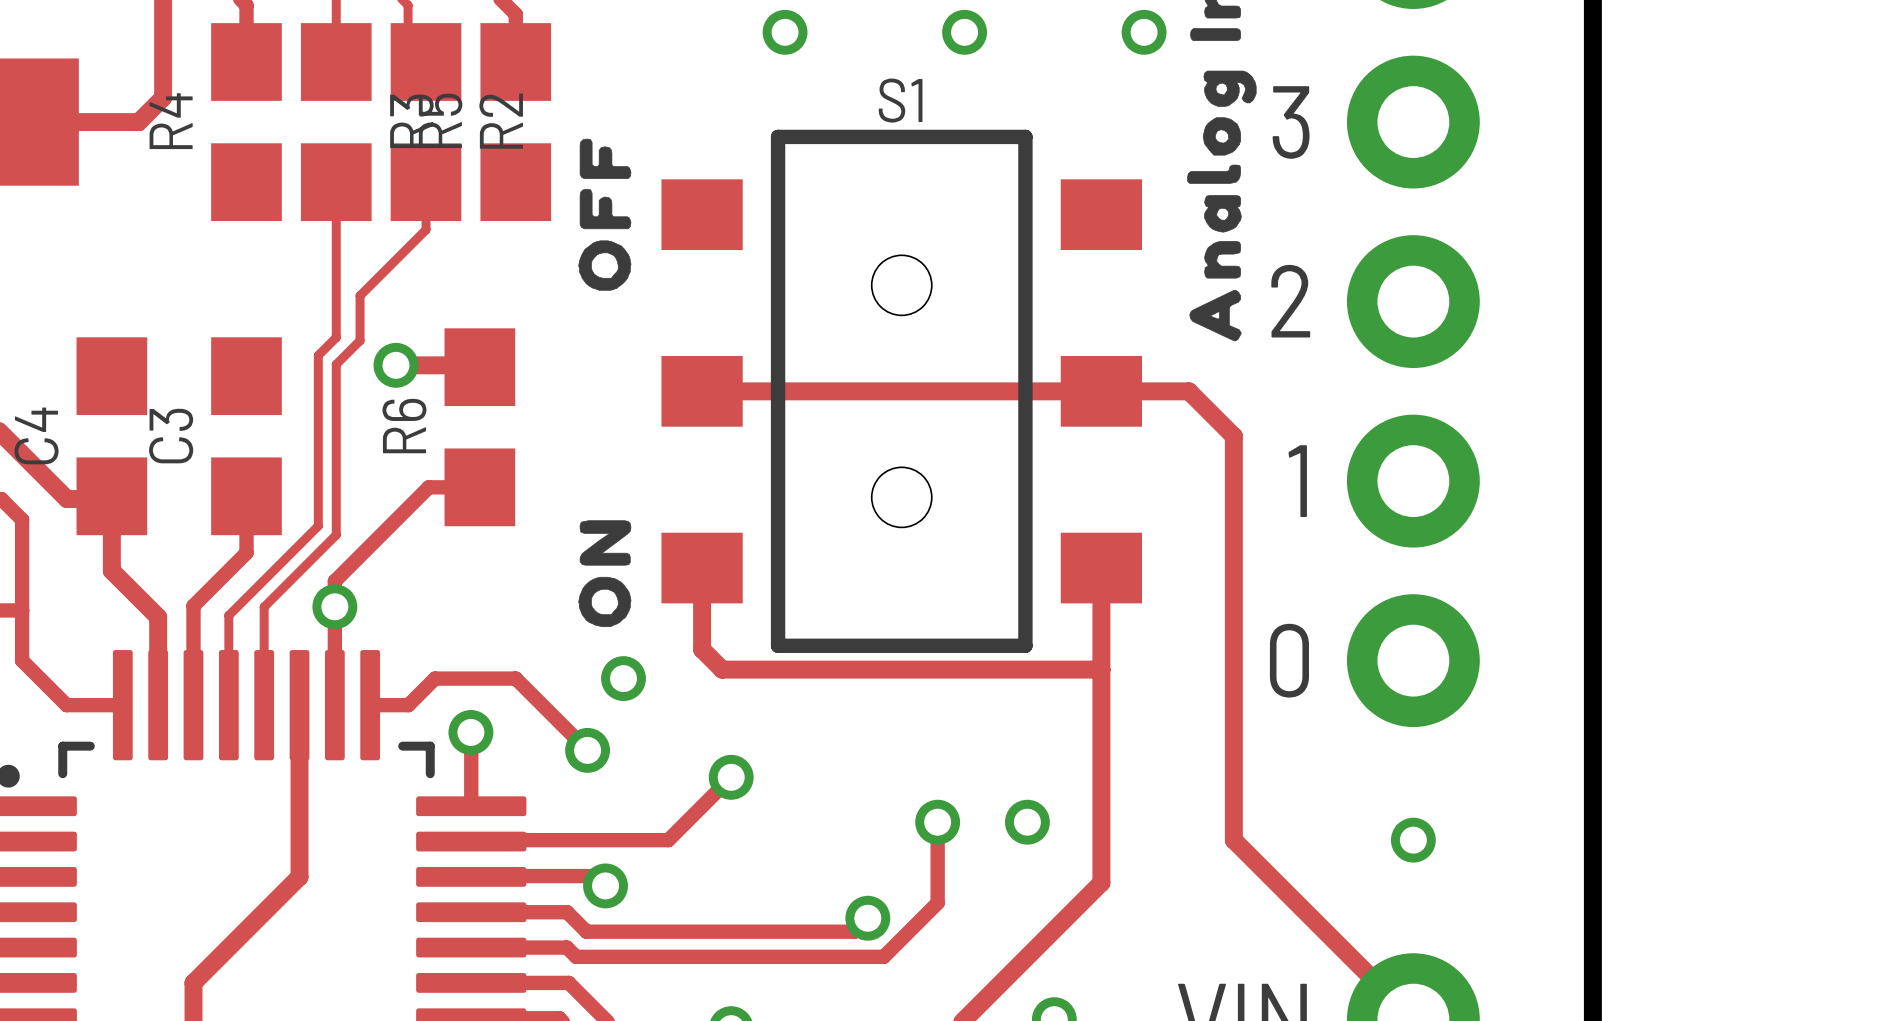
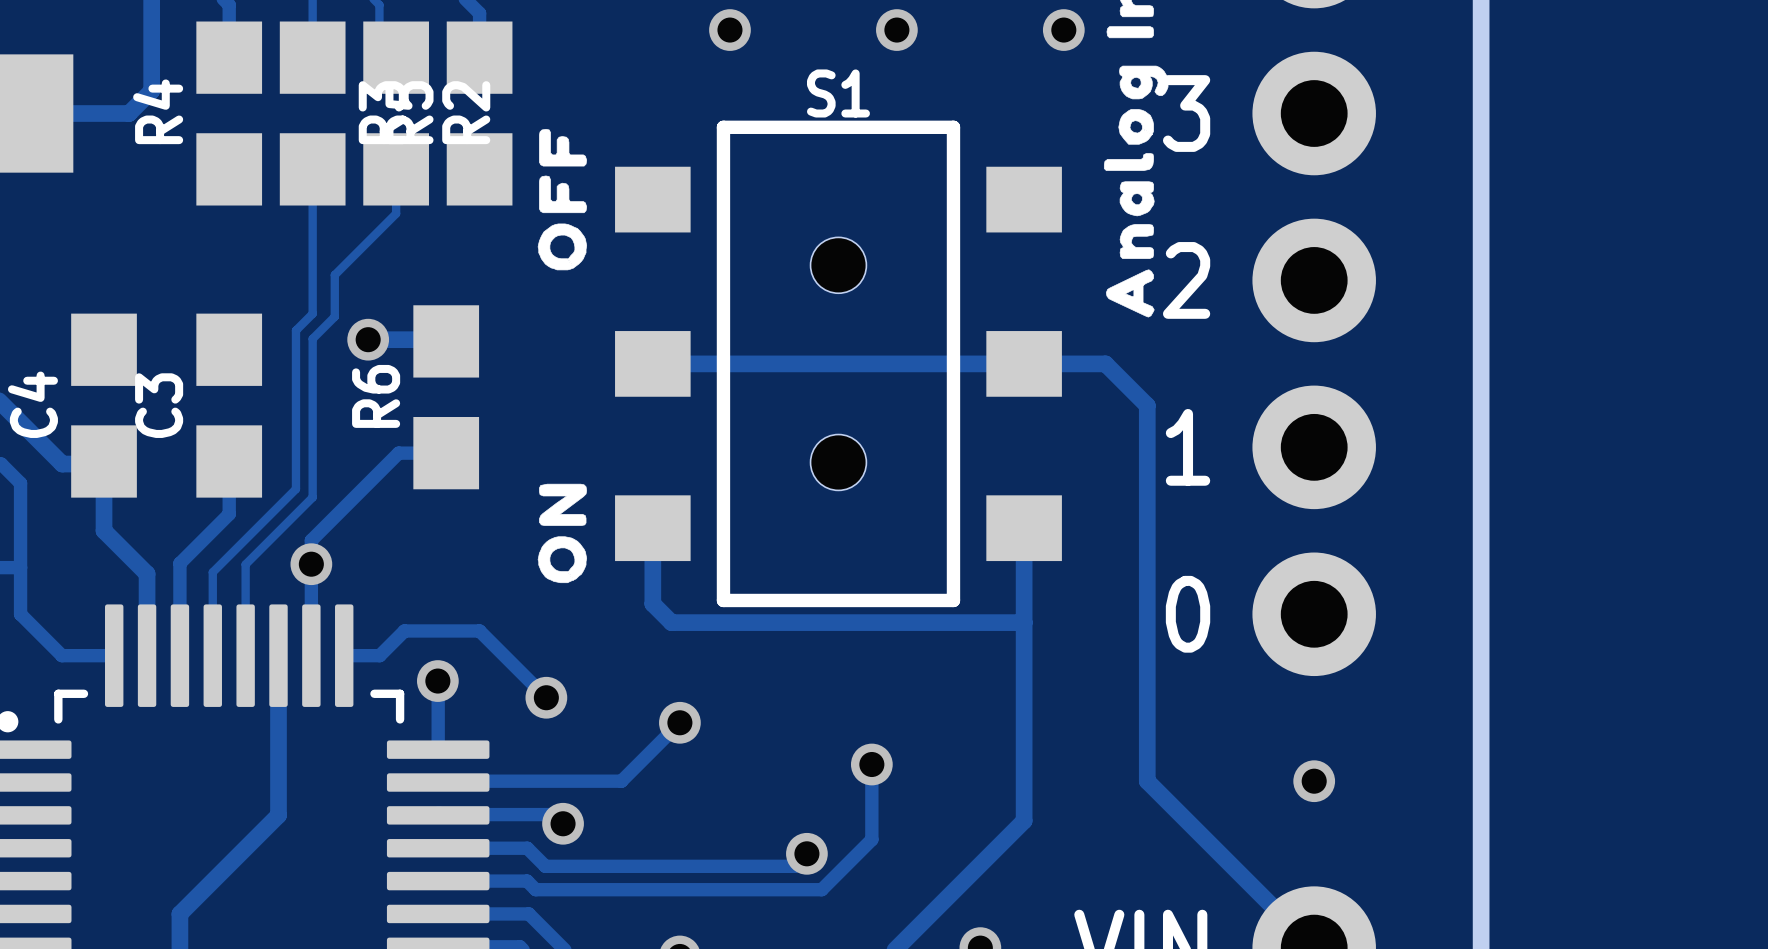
via: (623, 678) -> none
via: (1027, 822) -> none

